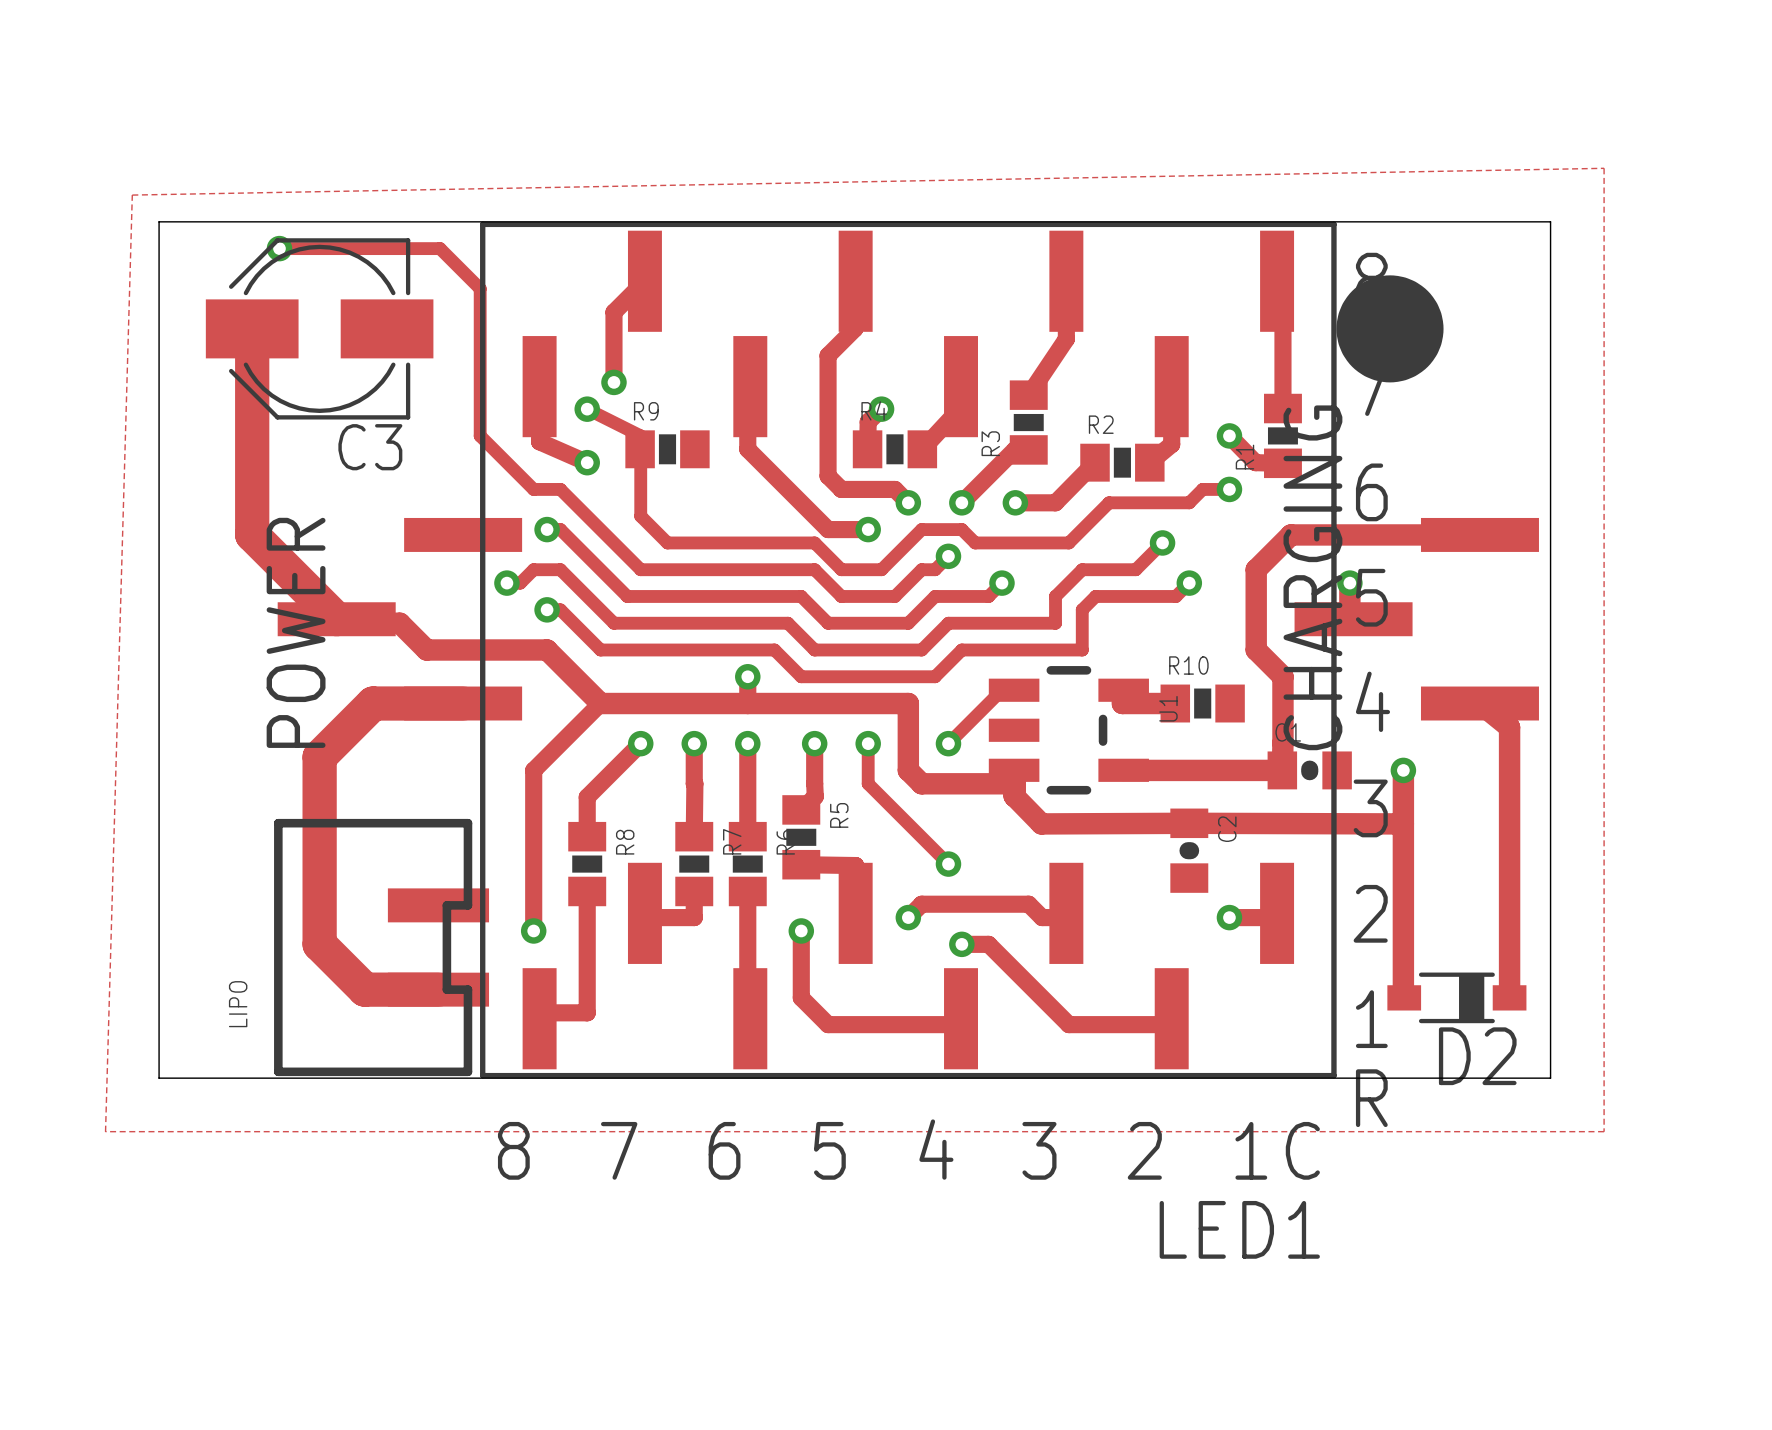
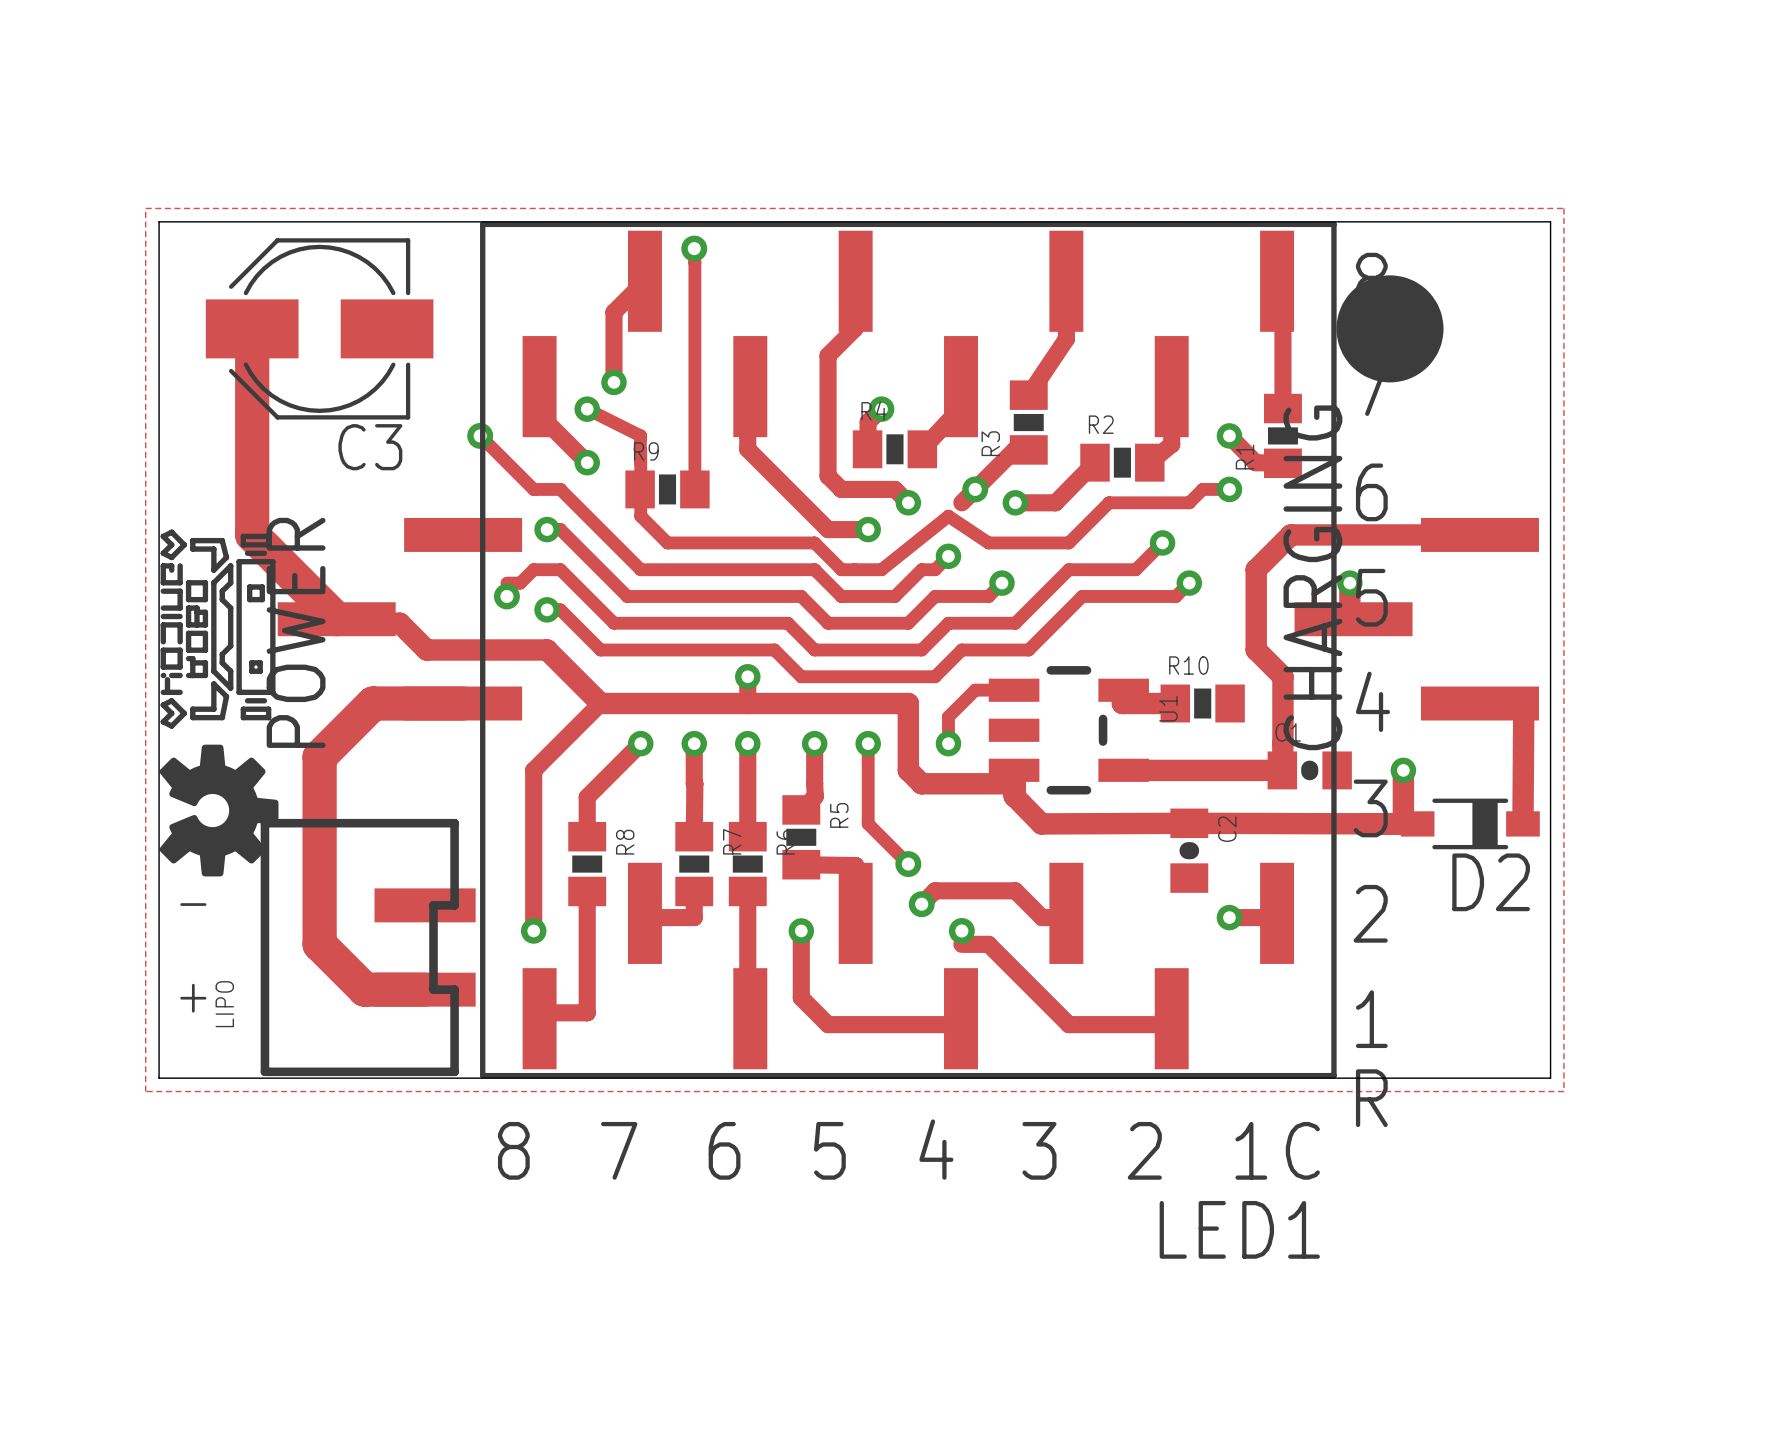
zone outline: (1604, 168) (132, 195) (105, 1131) (1604, 1131) (1604, 168) -> (145, 208) (145, 1091) (1563, 1091) (1563, 208) (145, 208)
track: (279, 248) (440, 248) (480, 288) (480, 435) -> none
via: (279, 248) -> none
track: none -> (694, 248) (694, 489)
via: none -> (694, 248)
track: (539, 415) (539, 441) (587, 462) -> (539, 415) (587, 462)
via: none -> (480, 435)
R9 position: (667, 449) -> (667, 489)
via position: (961, 502) -> (975, 489)
drawing: none -> [159, 529, 279, 877]
track: (988, 542) (975, 542) (961, 529) (921, 529) (881, 569) -> (988, 542) (948, 516) (881, 569)
track: (1082, 569) (1055, 596) (1055, 623) (1015, 623) -> (1082, 569) (1068, 569) (1015, 623)
via position: (506, 583) -> (506, 596)
track: (1095, 596) (1082, 609) (1082, 649) (1028, 649) -> (1095, 596) (1082, 596) (1028, 649)
track: (1001, 690) (948, 743) -> (1001, 690) (975, 690) (948, 716) (948, 743)
track: (1479, 703) (1509, 727) (1509, 997) -> (1479, 703) (1482, 700) (1483, 703) (1523, 703) (1522, 823)
track: (868, 783) (948, 864) -> (868, 783) (868, 823) (908, 864)
track: (1403, 823) (1404, 997) -> none
via: none -> (908, 864)
via: (948, 864) -> none
text: none -> - (193, 904)
track: (1028, 904) (921, 904) (908, 917) -> (1028, 904) (1015, 890) (935, 890) (921, 904)
via position: (908, 917) -> (921, 904)
via position: (961, 944) -> (961, 930)
LIPO position: (381, 947) -> (368, 947)
D2 position: (1456, 997) -> (1470, 823)
text: none -> + (193, 998)

